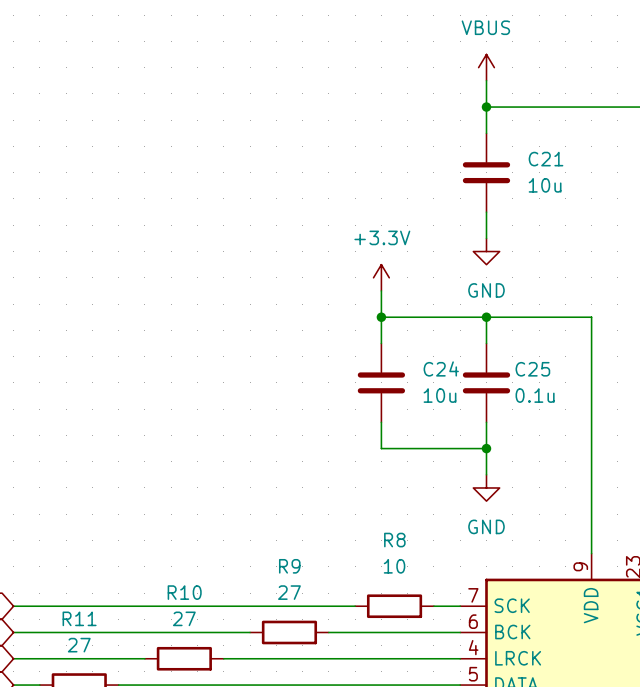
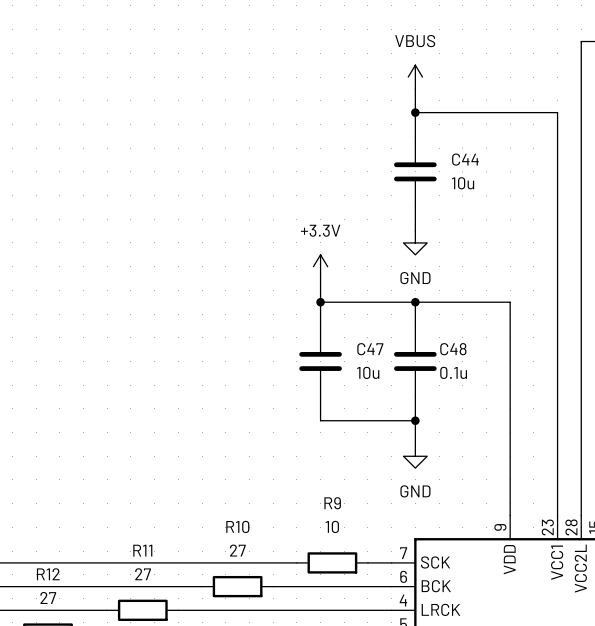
C21 name: C21 (546, 159) -> C44 (465, 159)
C24 name: C24 (441, 368) -> C47 (370, 349)
C25 name: C25 (532, 369) -> C48 (453, 349)
R8 name: R8 (394, 540) -> R9 (332, 503)
R9 name: R9 (289, 566) -> R10 (237, 526)
R10 name: R10 (184, 592) -> R11 (142, 550)
R11 name: R11 (79, 618) -> R12 (48, 574)

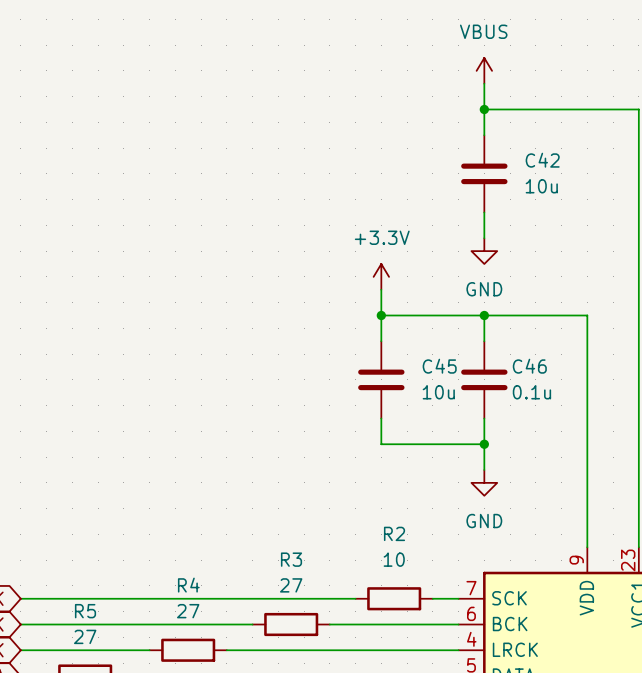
C44 name: C44 (465, 159) -> C42 (542, 160)
C47 name: C47 (370, 349) -> C45 (439, 366)
C48 name: C48 (453, 349) -> C46 (529, 366)
R9 name: R9 (332, 503) -> R2 (394, 533)
R10 name: R10 (237, 526) -> R3 (291, 559)
R11 name: R11 (142, 550) -> R4 (188, 585)
R12 name: R12 (48, 574) -> R5 (85, 611)

